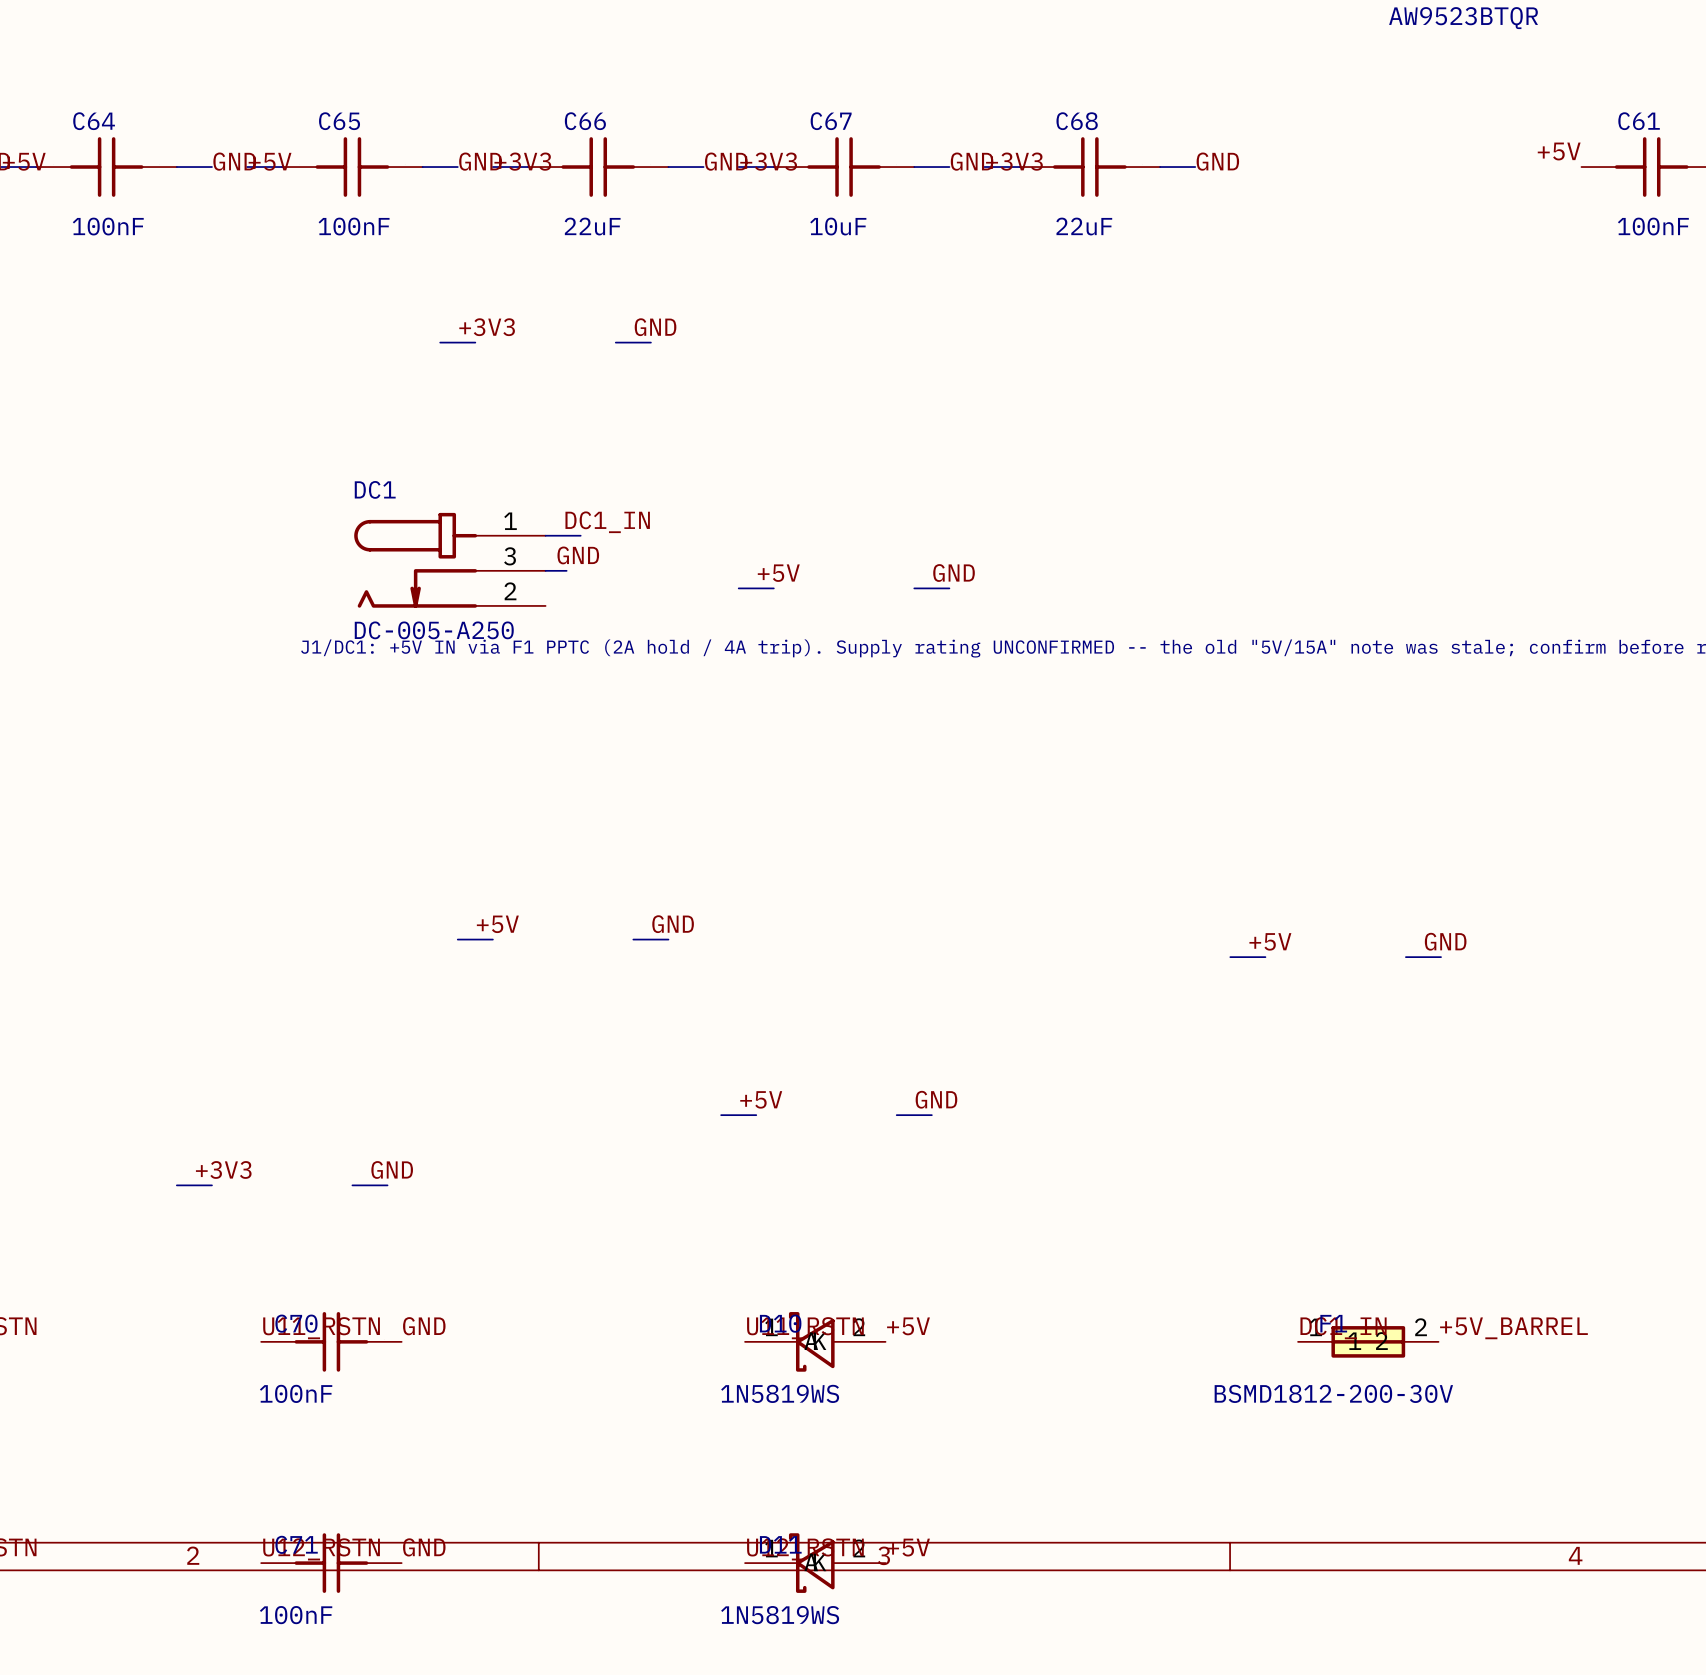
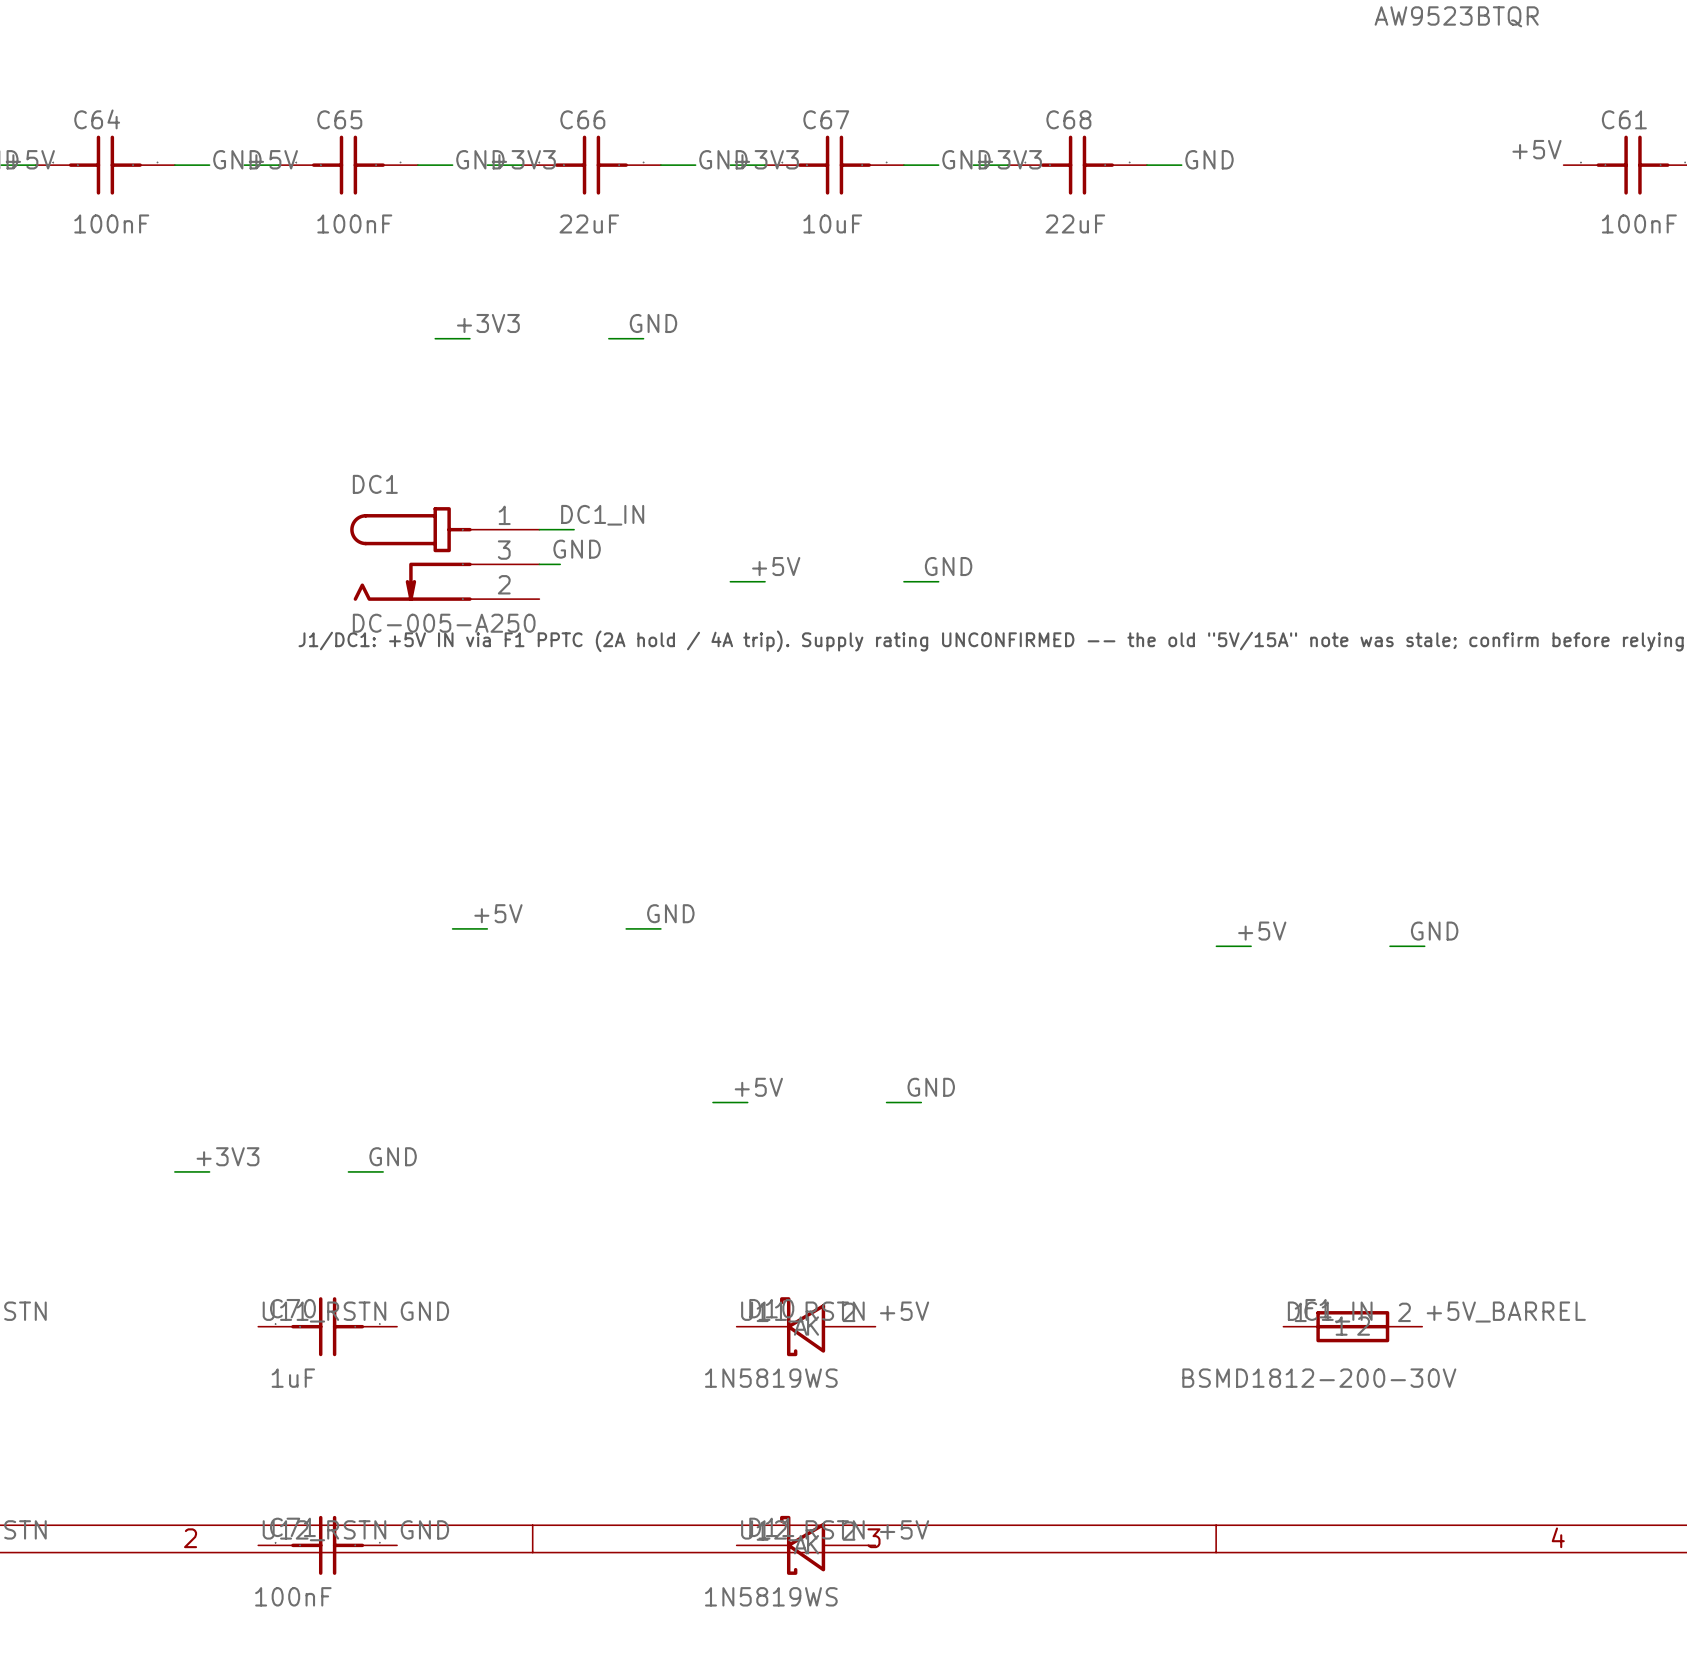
C70 value: 100nF (296, 1393) -> 1uF (293, 1378)

